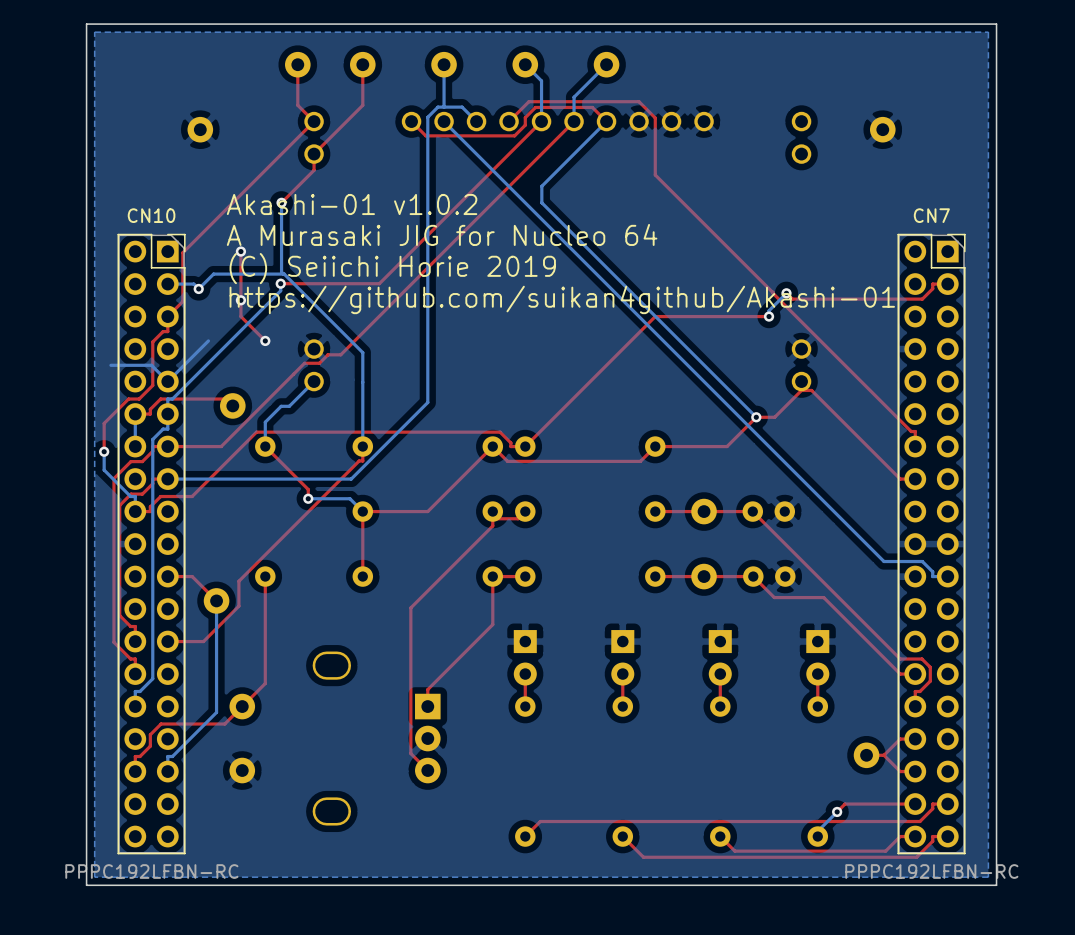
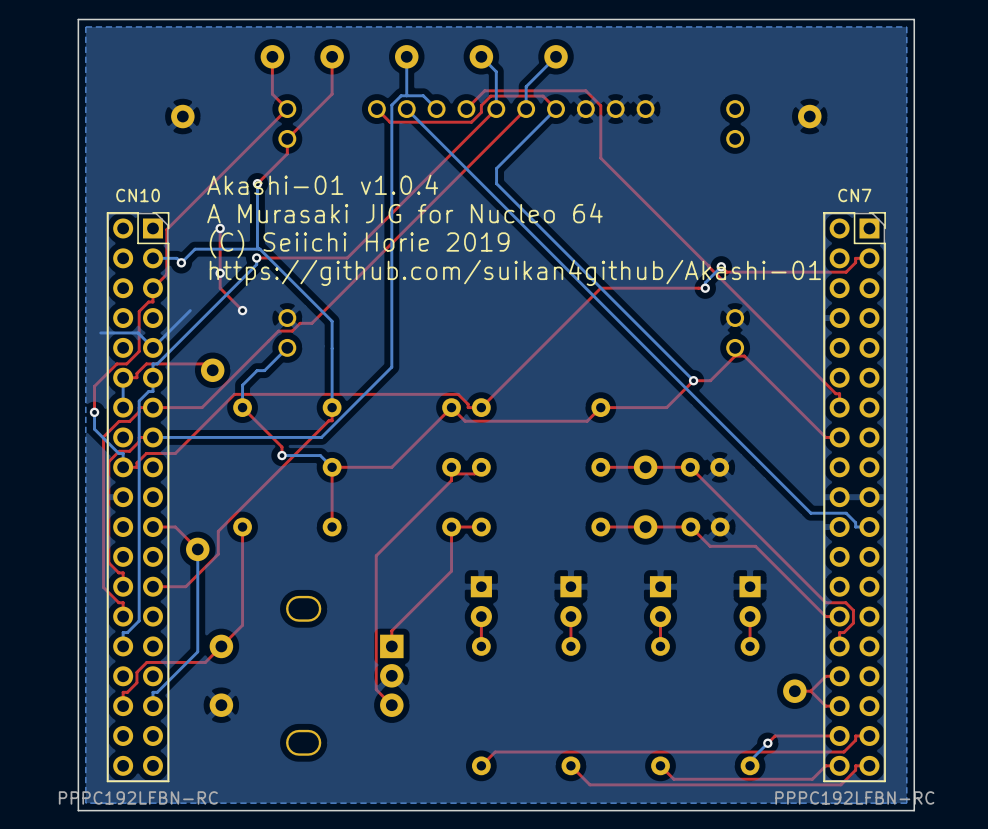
text: Akashi-01 v1.0.2 (352, 204) -> Akashi-01 v1.0.4 (322, 184)

